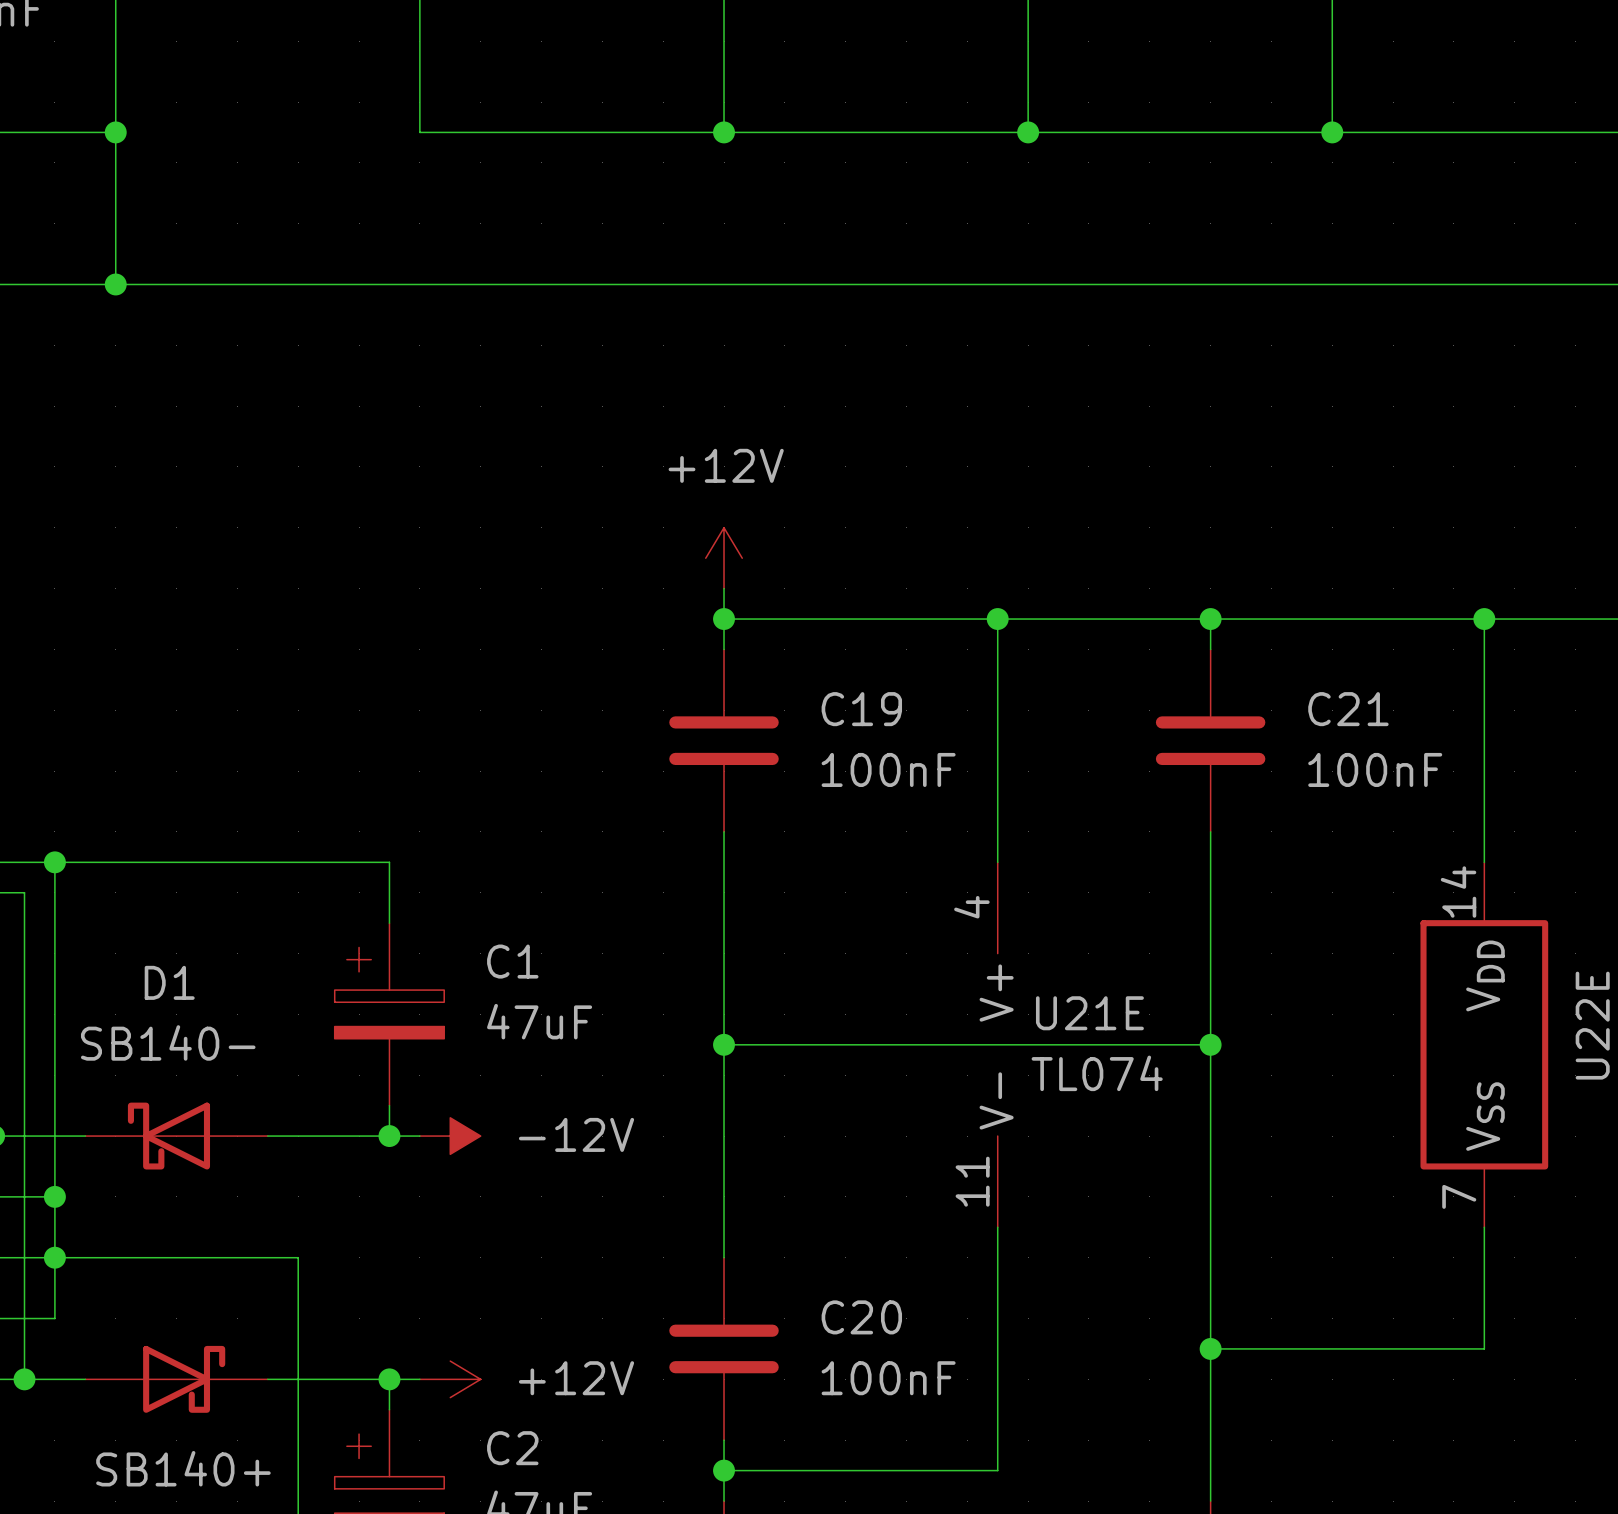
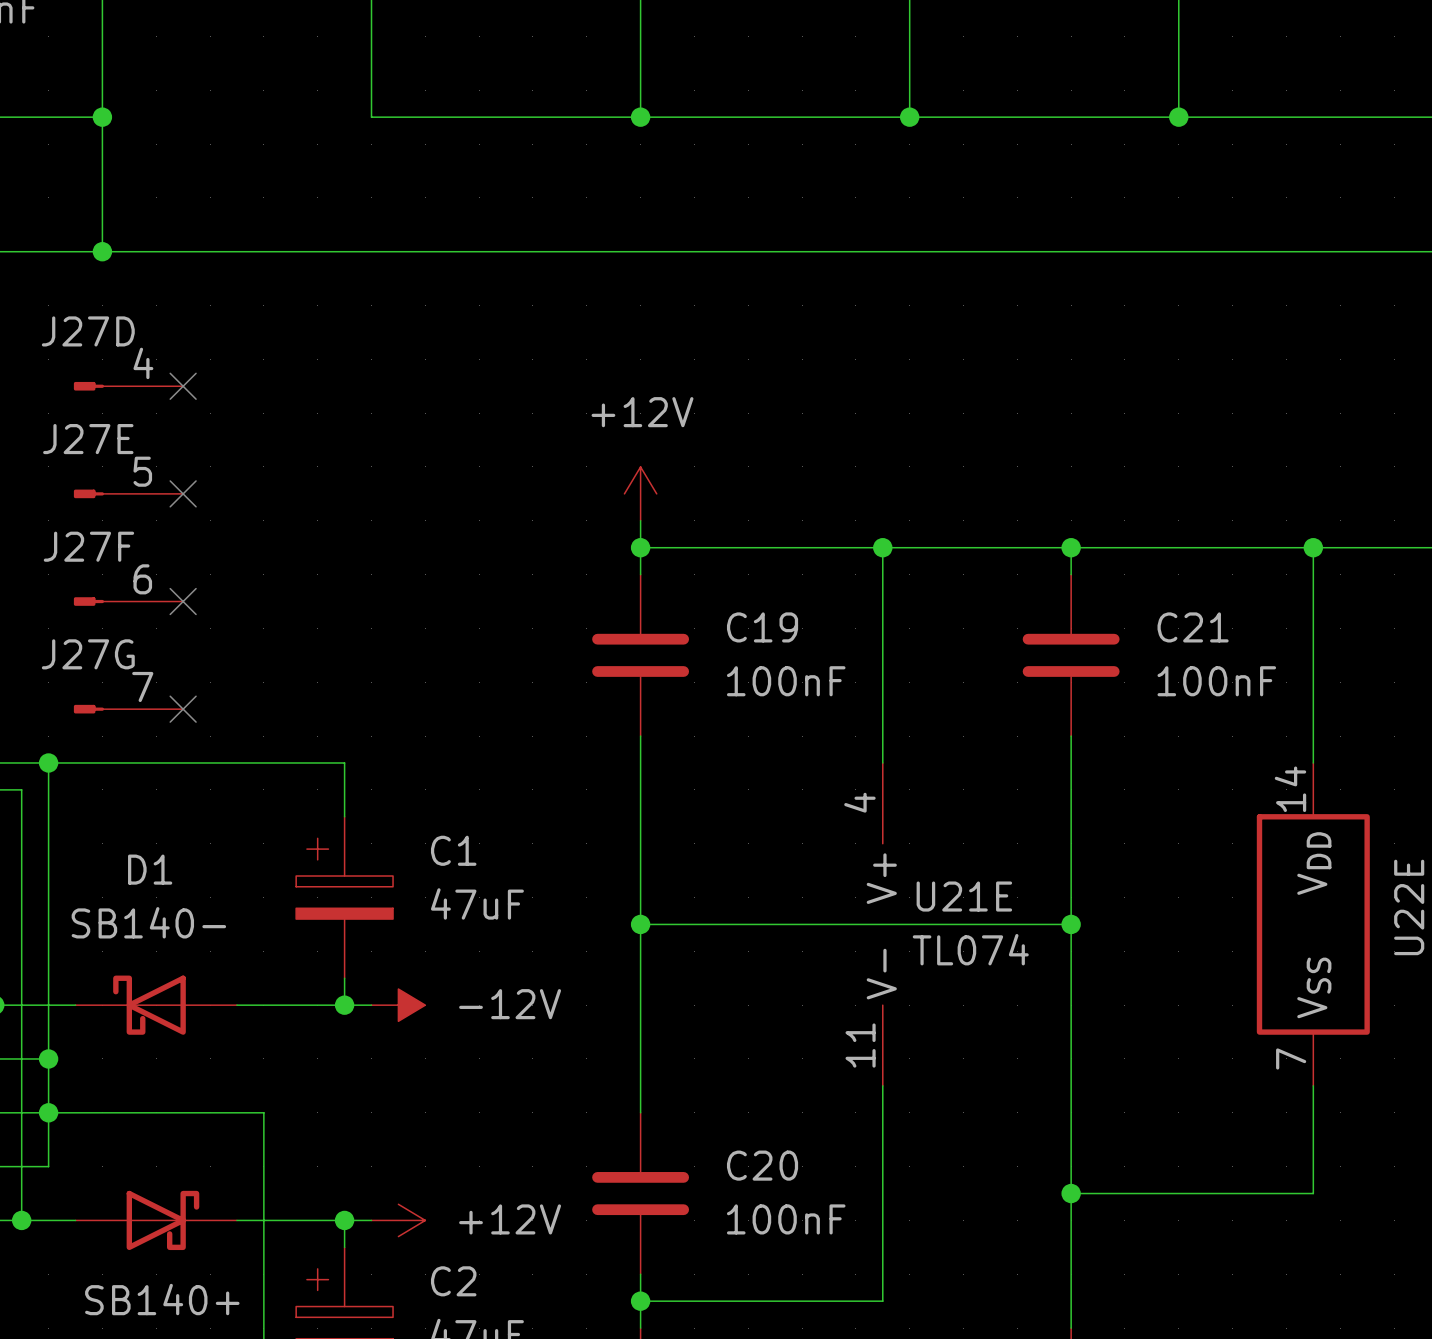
J27D: none -> (128, 386)
no-connect mark: none -> (183, 386)
J27E: none -> (128, 493)
no-connect mark: none -> (183, 493)
J27F: none -> (128, 601)
no-connect mark: none -> (183, 601)
J27G: none -> (128, 709)
no-connect mark: none -> (183, 709)

